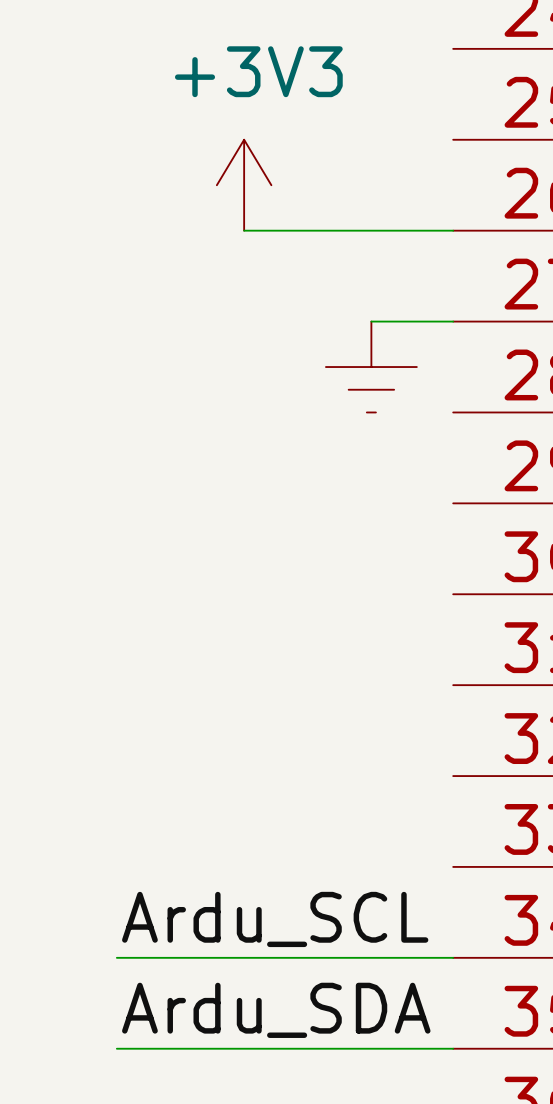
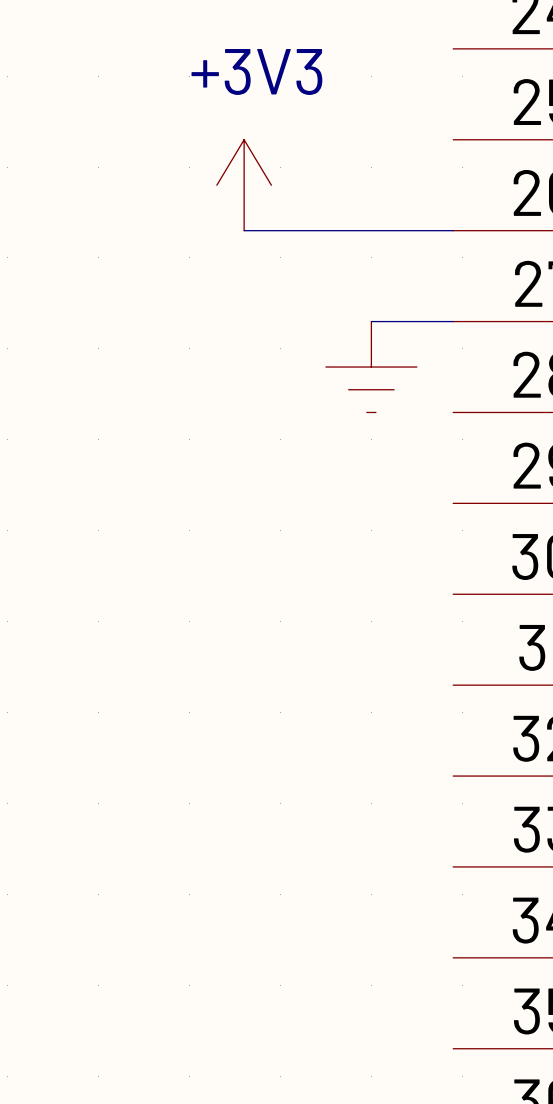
label: Ardu_SCL (275, 919) -> none
wire: (116, 957) (453, 957) -> none
label: Ardu_SDA (276, 1010) -> none
wire: (116, 1048) (453, 1048) -> none

